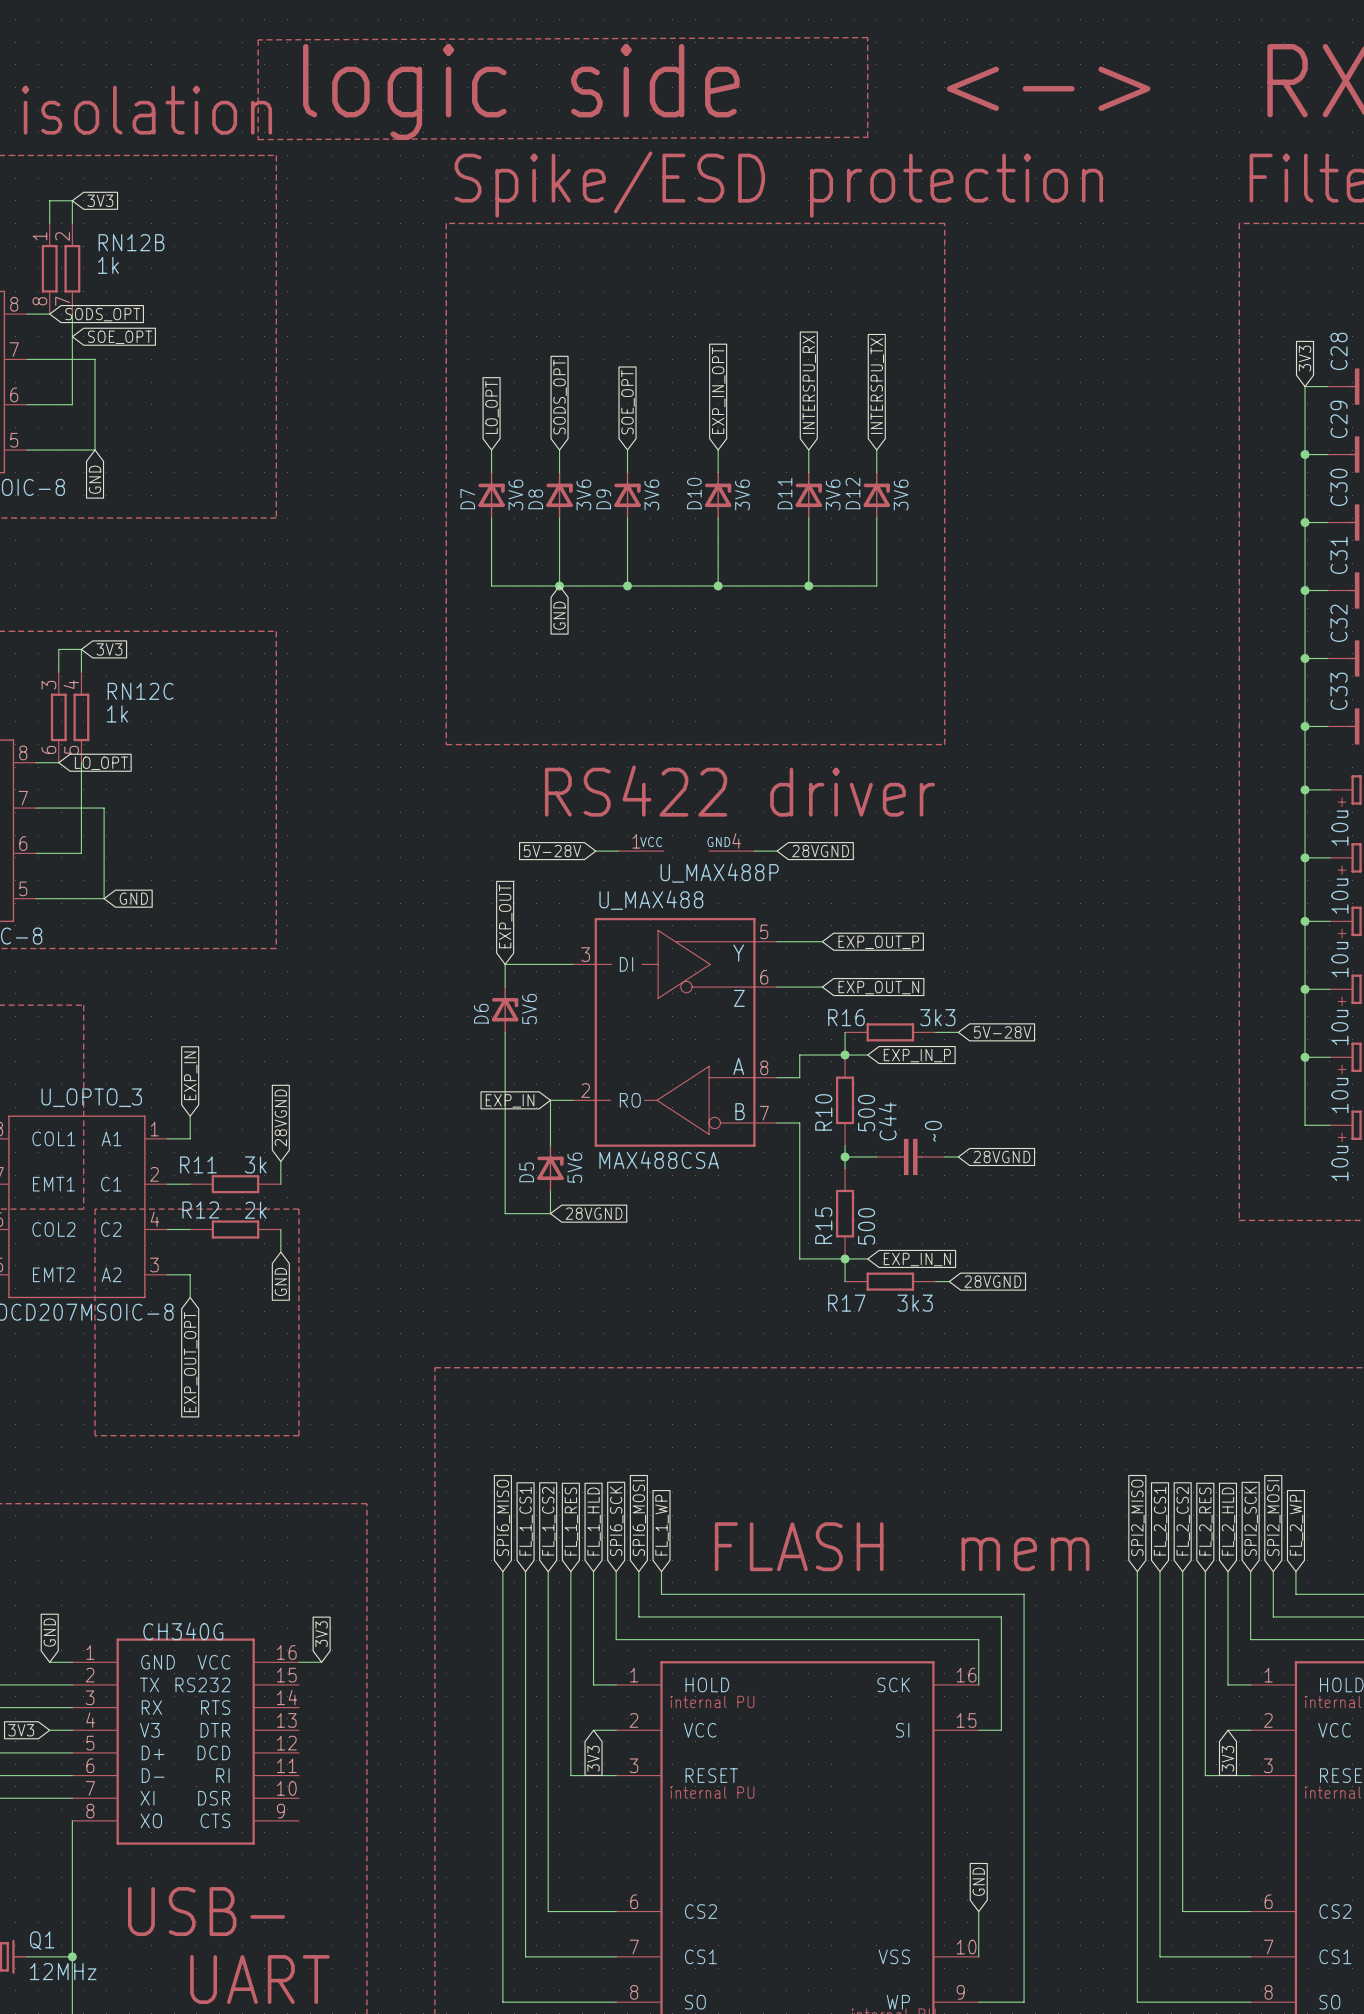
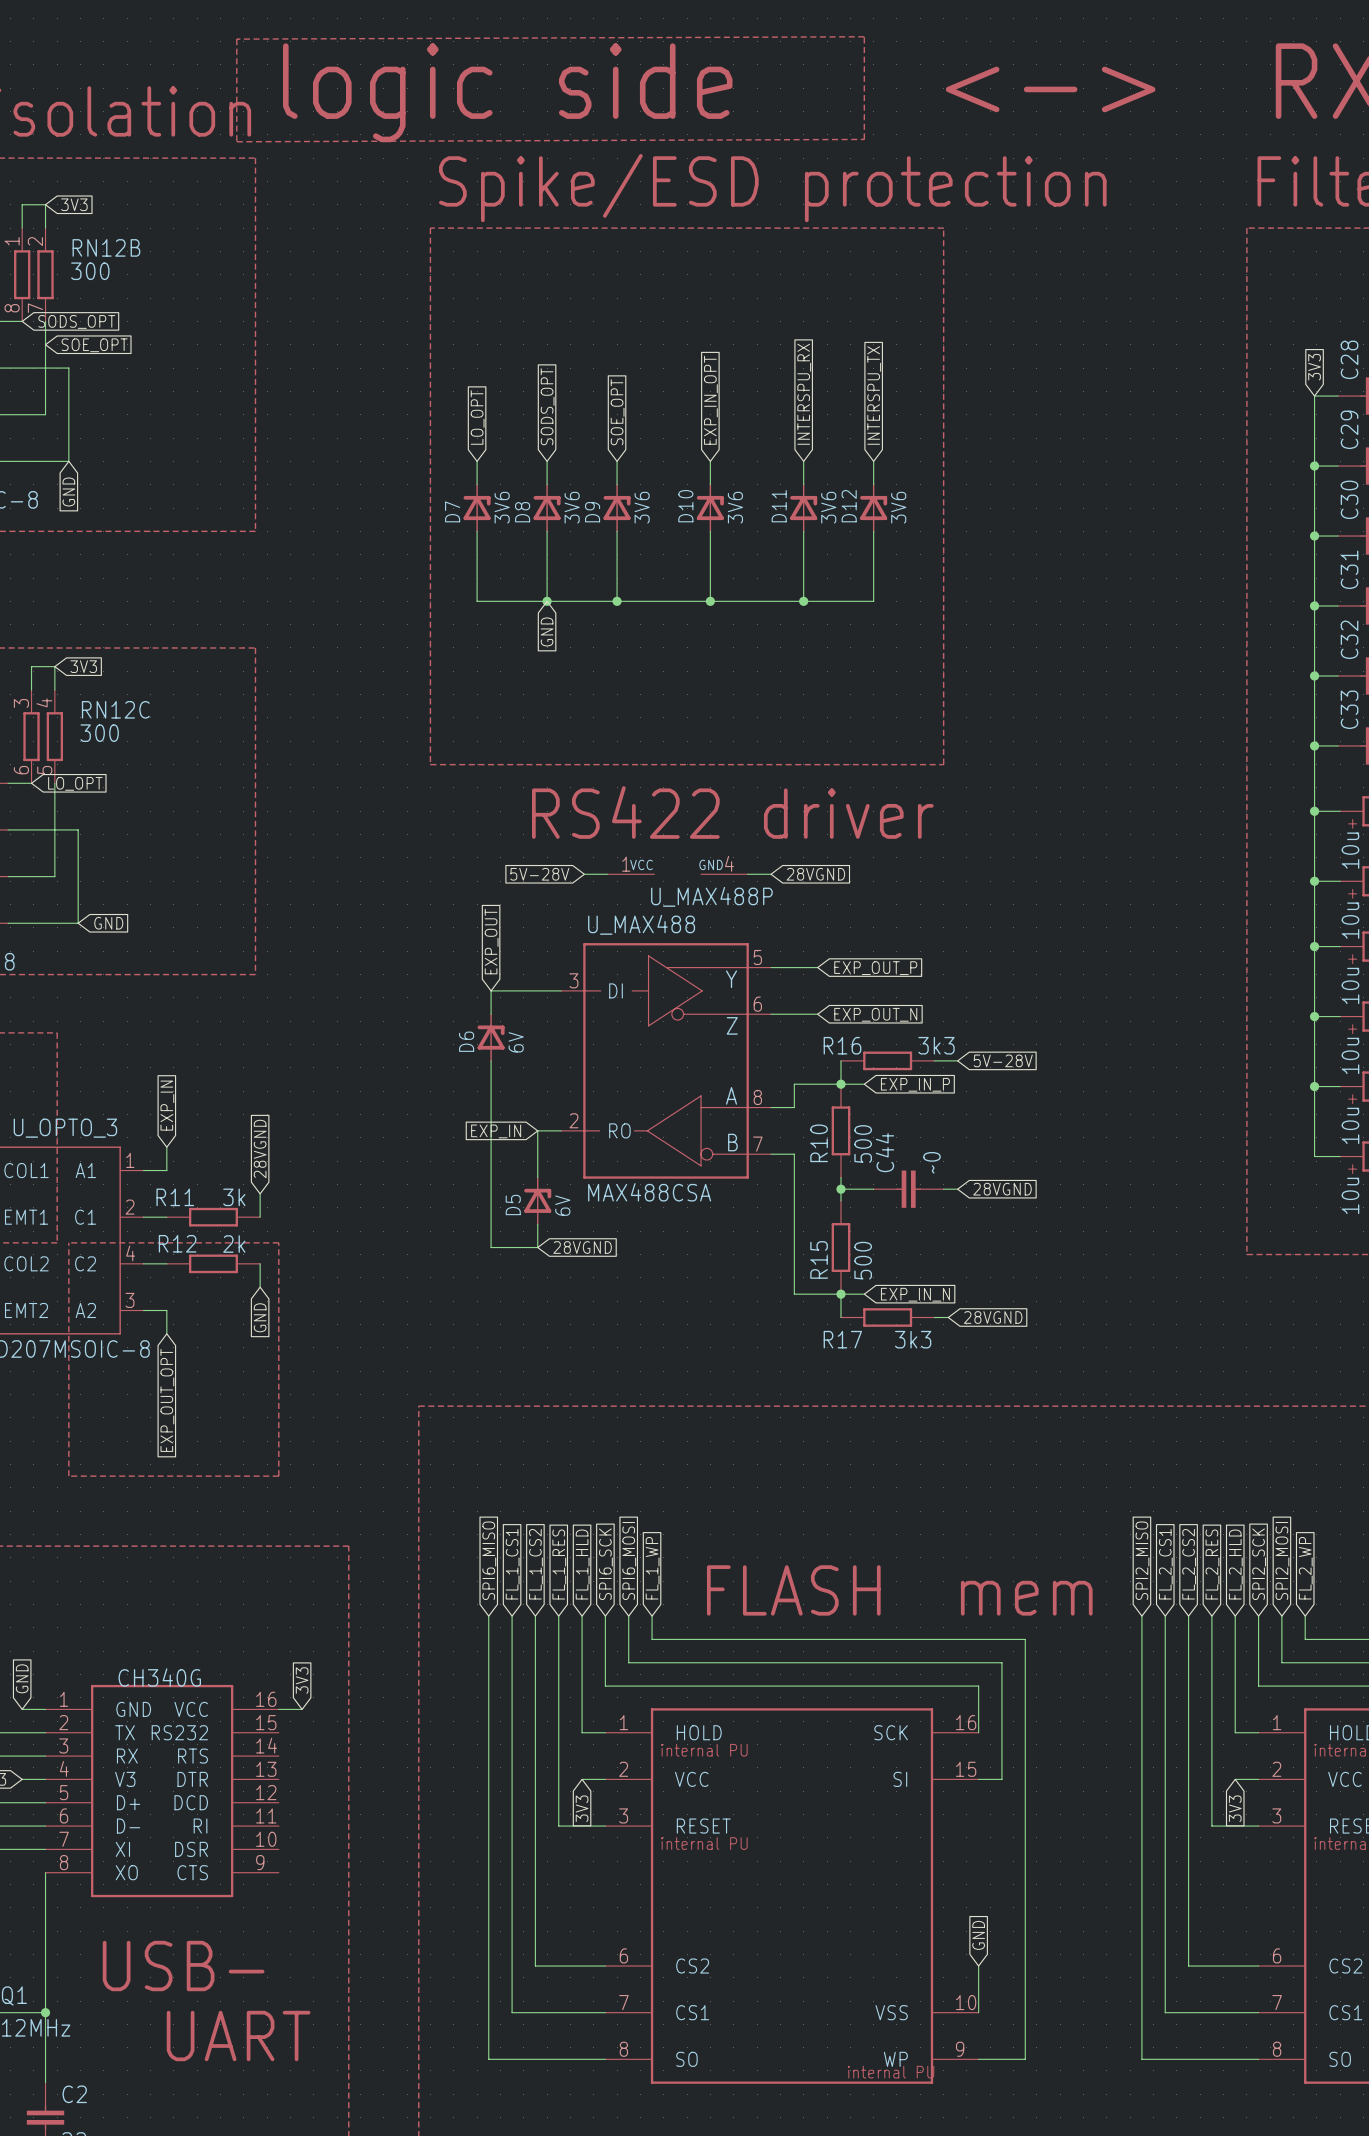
RN12B value: 1k (108, 265) -> 300 (90, 271)
RN12C value: 1k (117, 714) -> 300 (99, 733)
D6 value: 5V6 (529, 1009) -> 6V (516, 1042)
D5 value: 5V6 (574, 1167) -> 6V (562, 1205)

